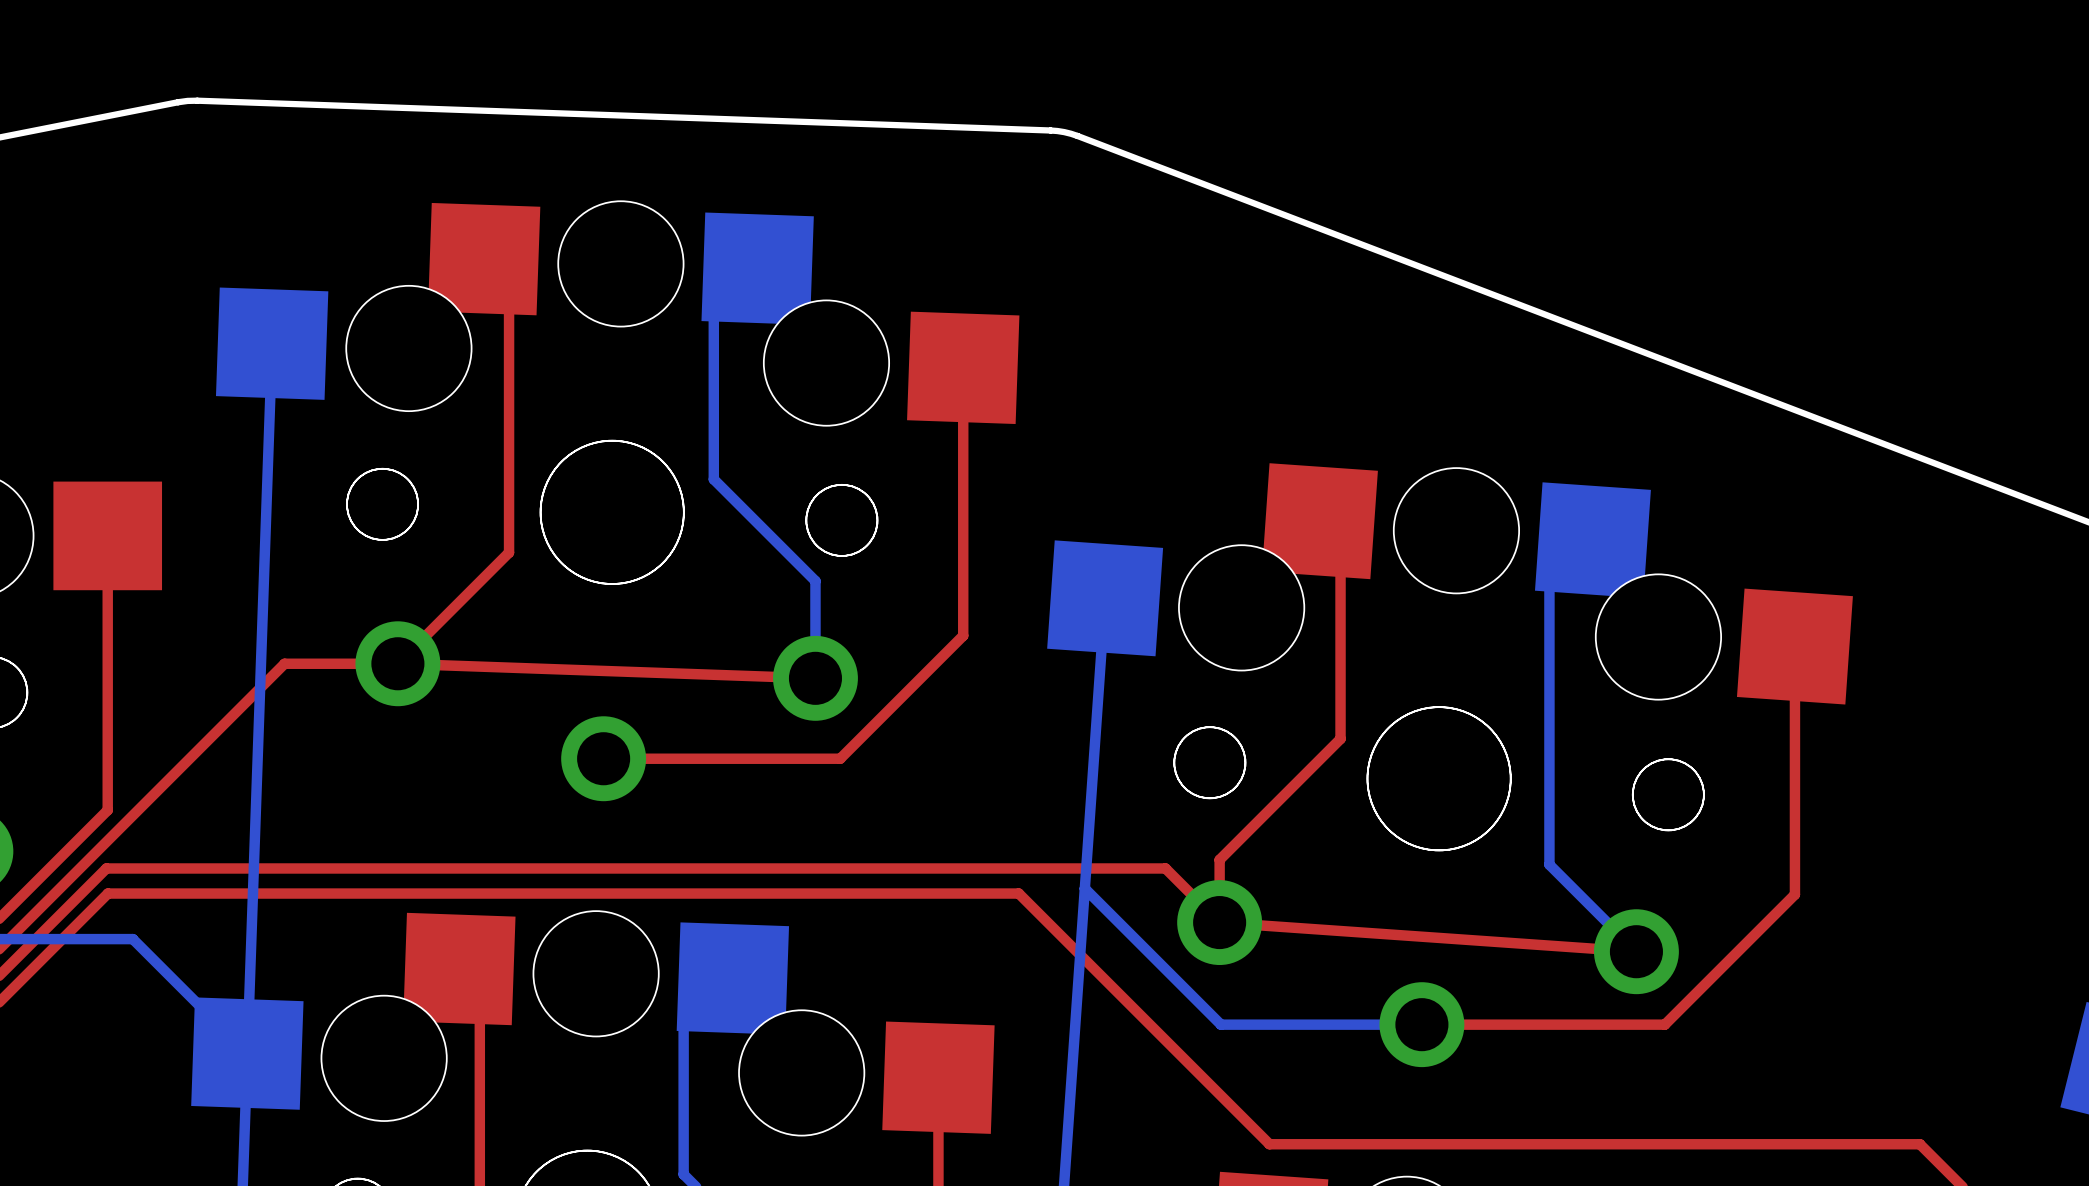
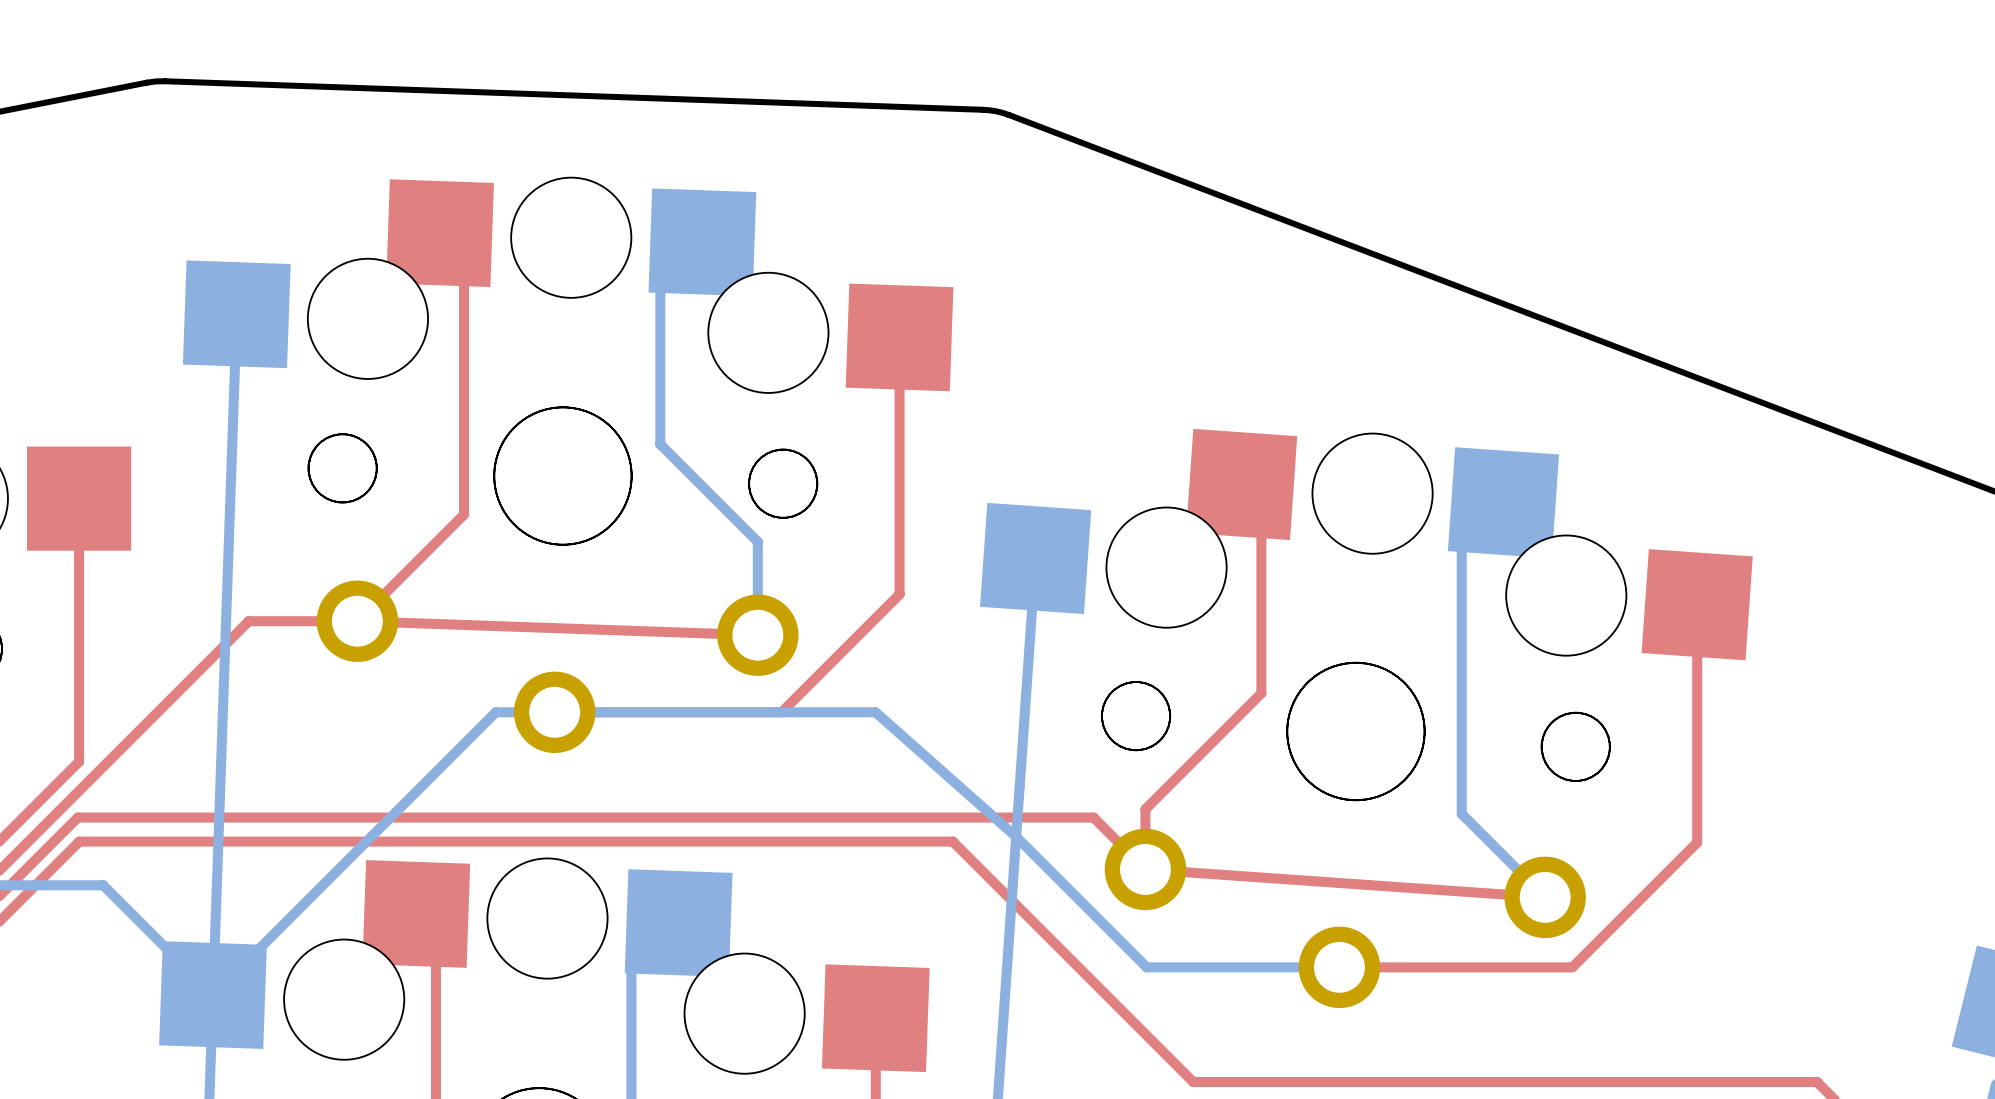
bottom track: none -> (1016, 836) (875, 712) (495, 712) (213, 995)

